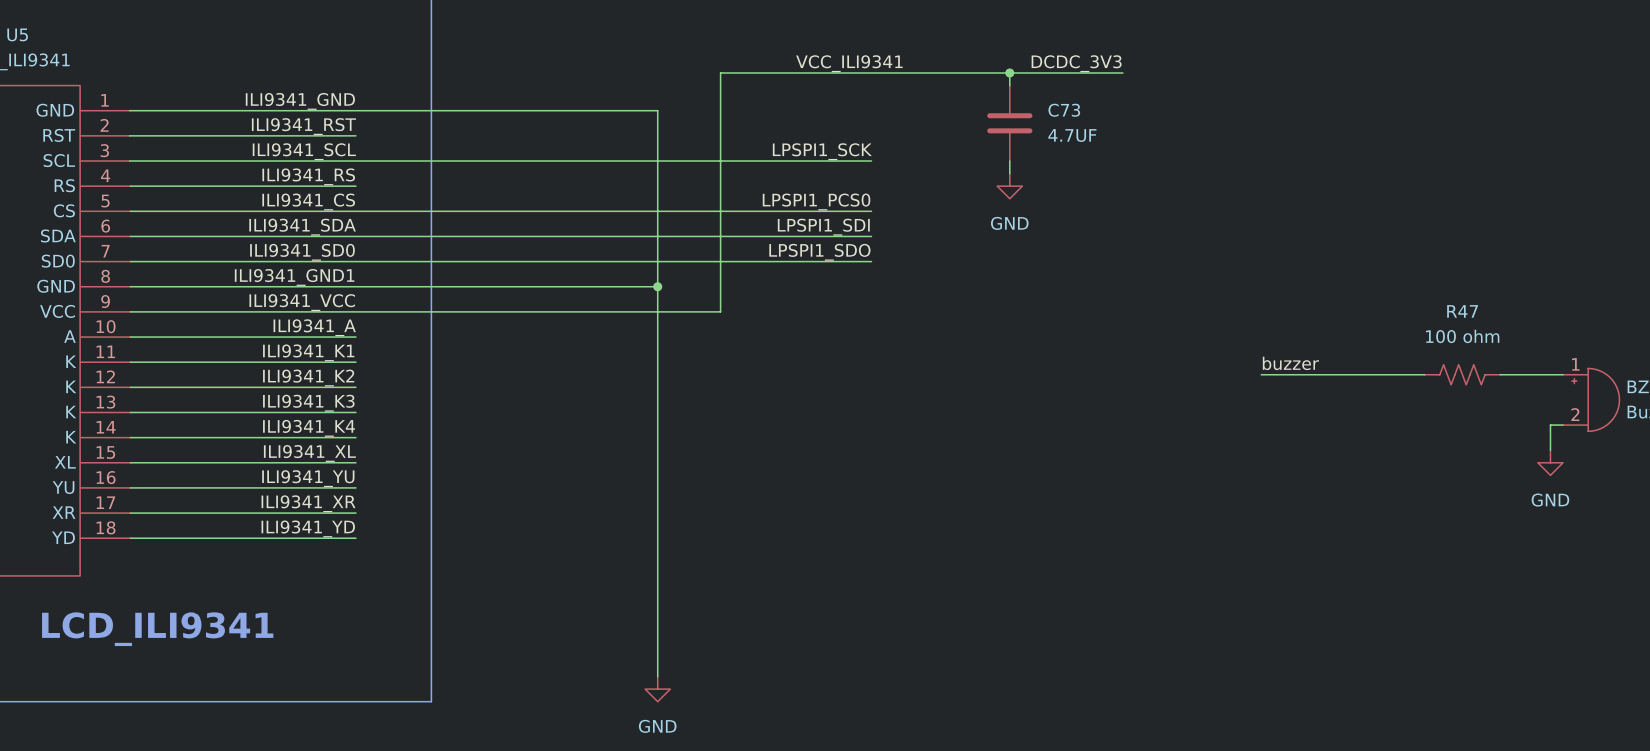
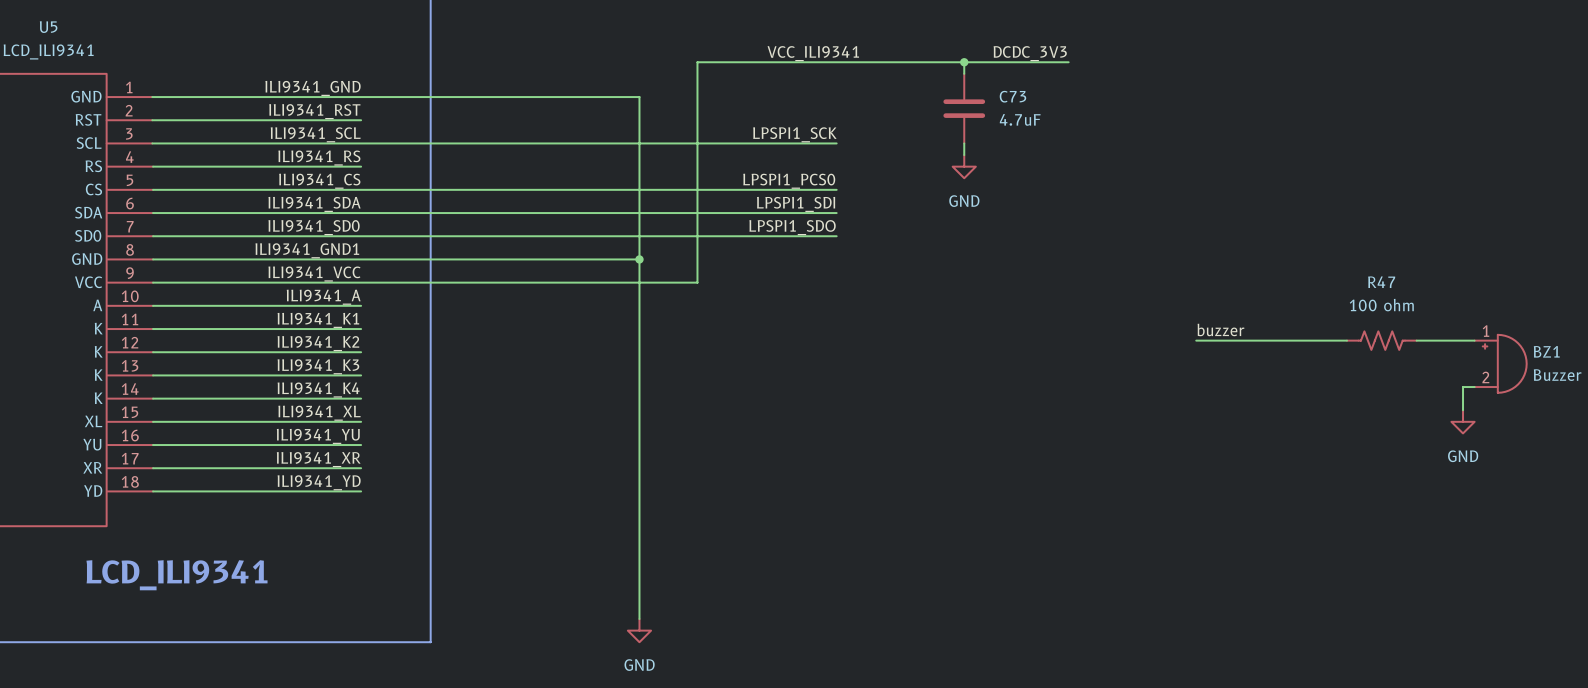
C73 value: 4.7UF (1072, 135) -> 4.7uF (1020, 119)

